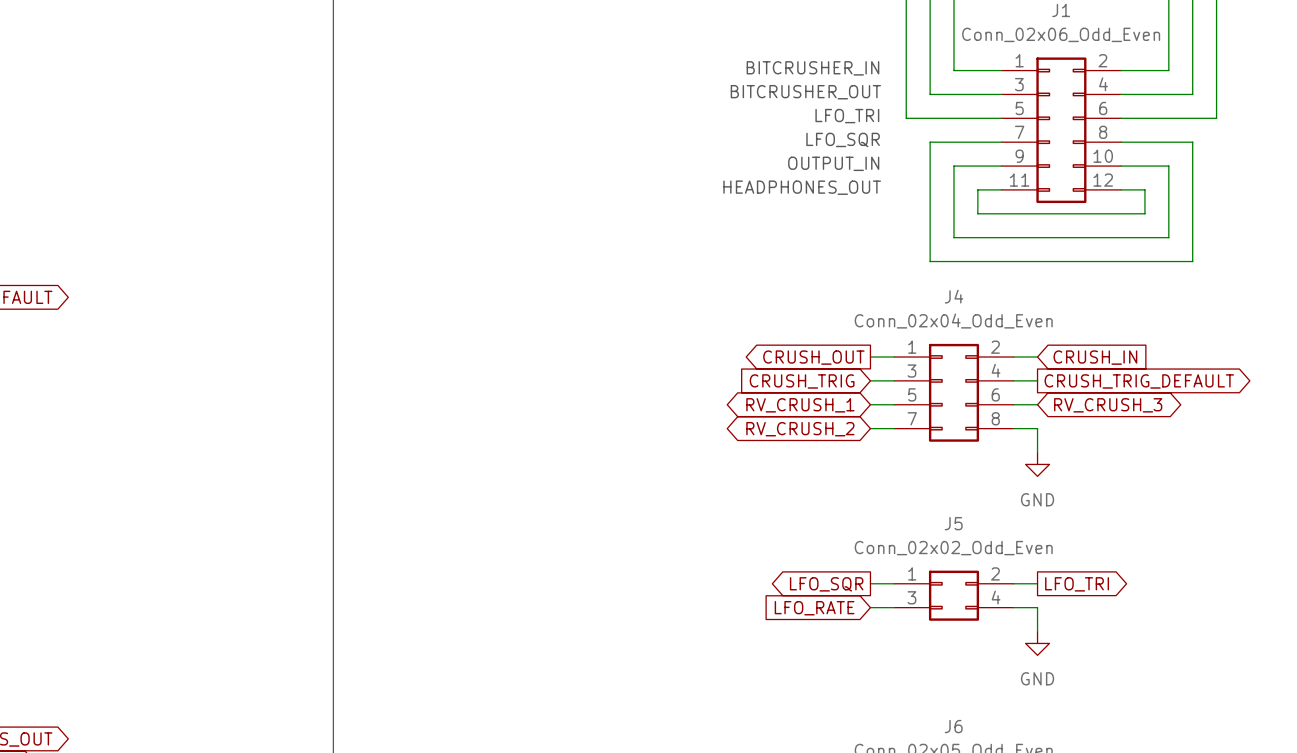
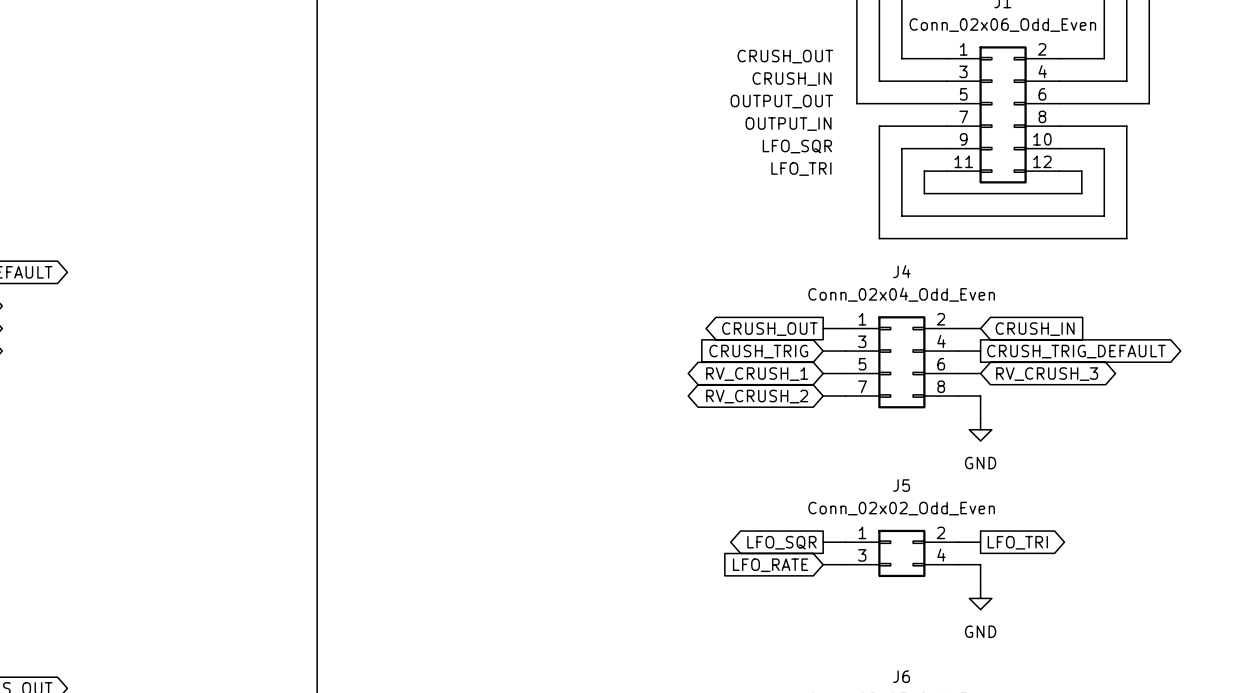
text: BITCRUSHER_IN (812, 68) -> CRUSH_OUT (785, 56)
text: BITCRUSHER_OUT (805, 92) -> CRUSH_IN (792, 79)
text: LFO_TRI (847, 116) -> OUTPUT_OUT (781, 101)
text: LFO_SQR (843, 139) -> OUTPUT_IN (788, 124)
text: OUTPUT_IN (833, 163) -> LFO_SQR (797, 146)
text: HEADPHONES_OUT (802, 187) -> LFO_TRI (801, 169)

